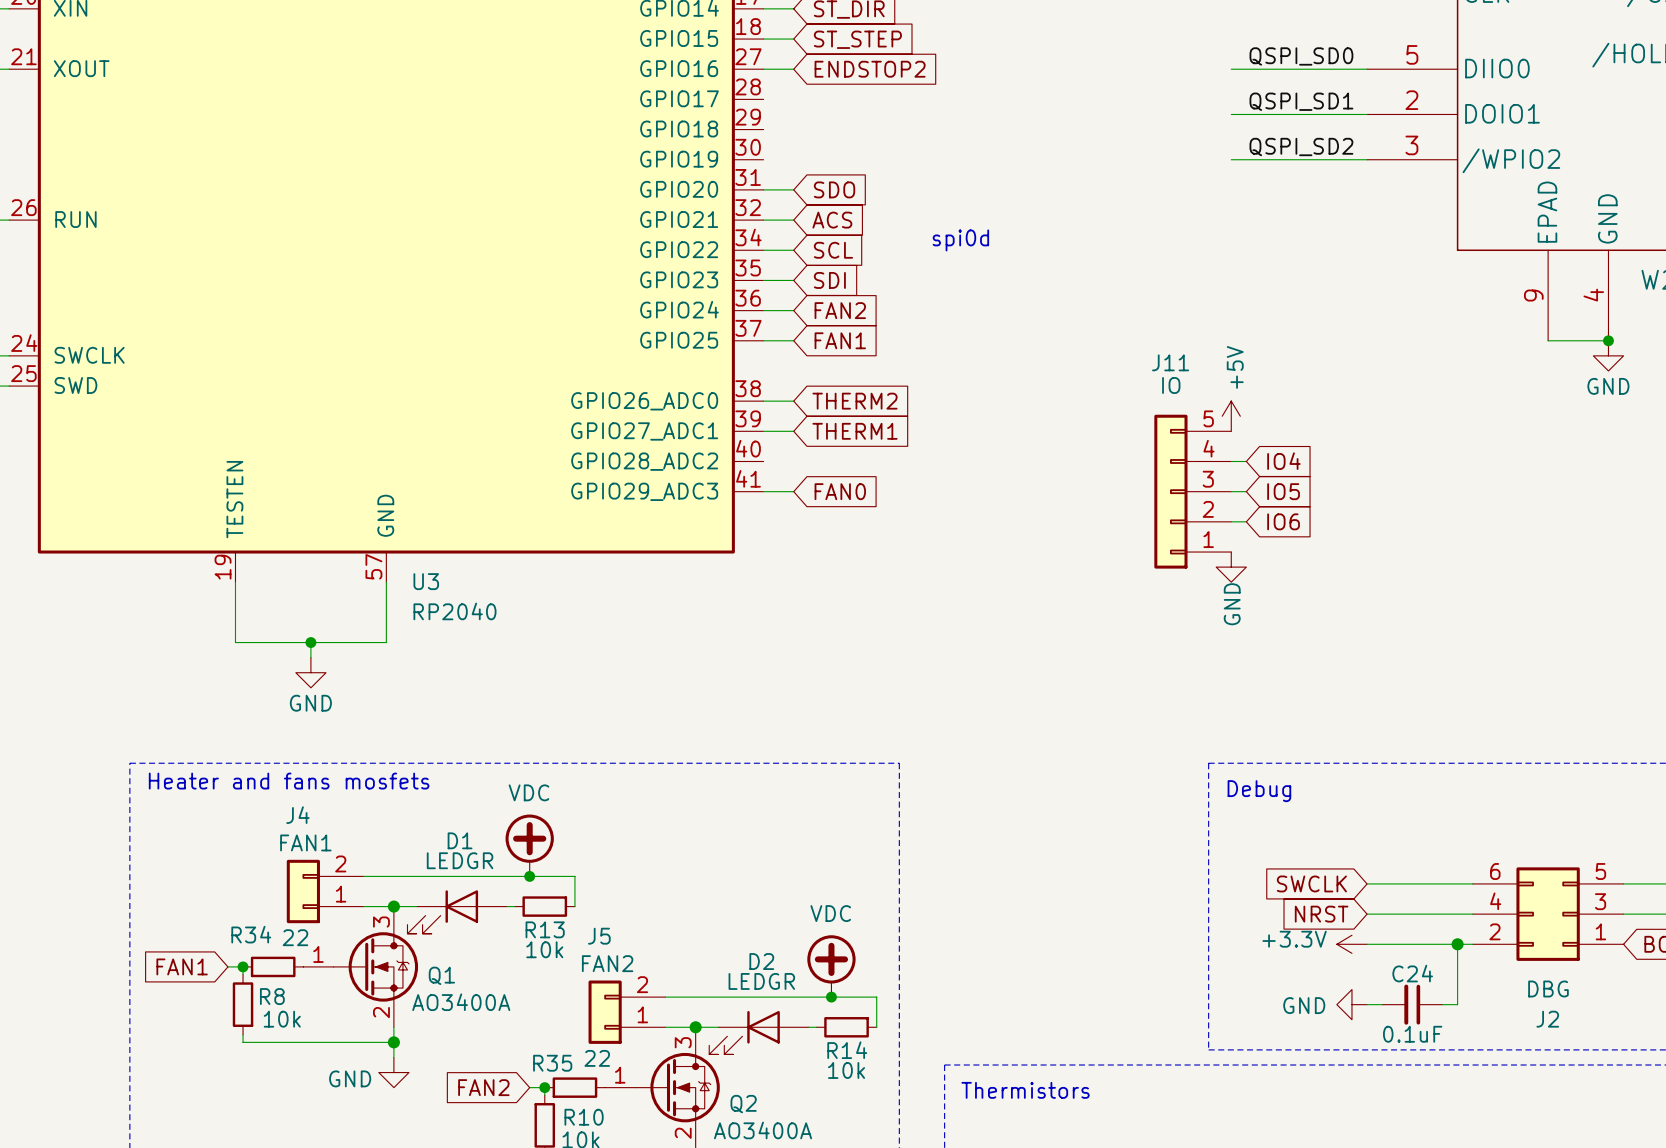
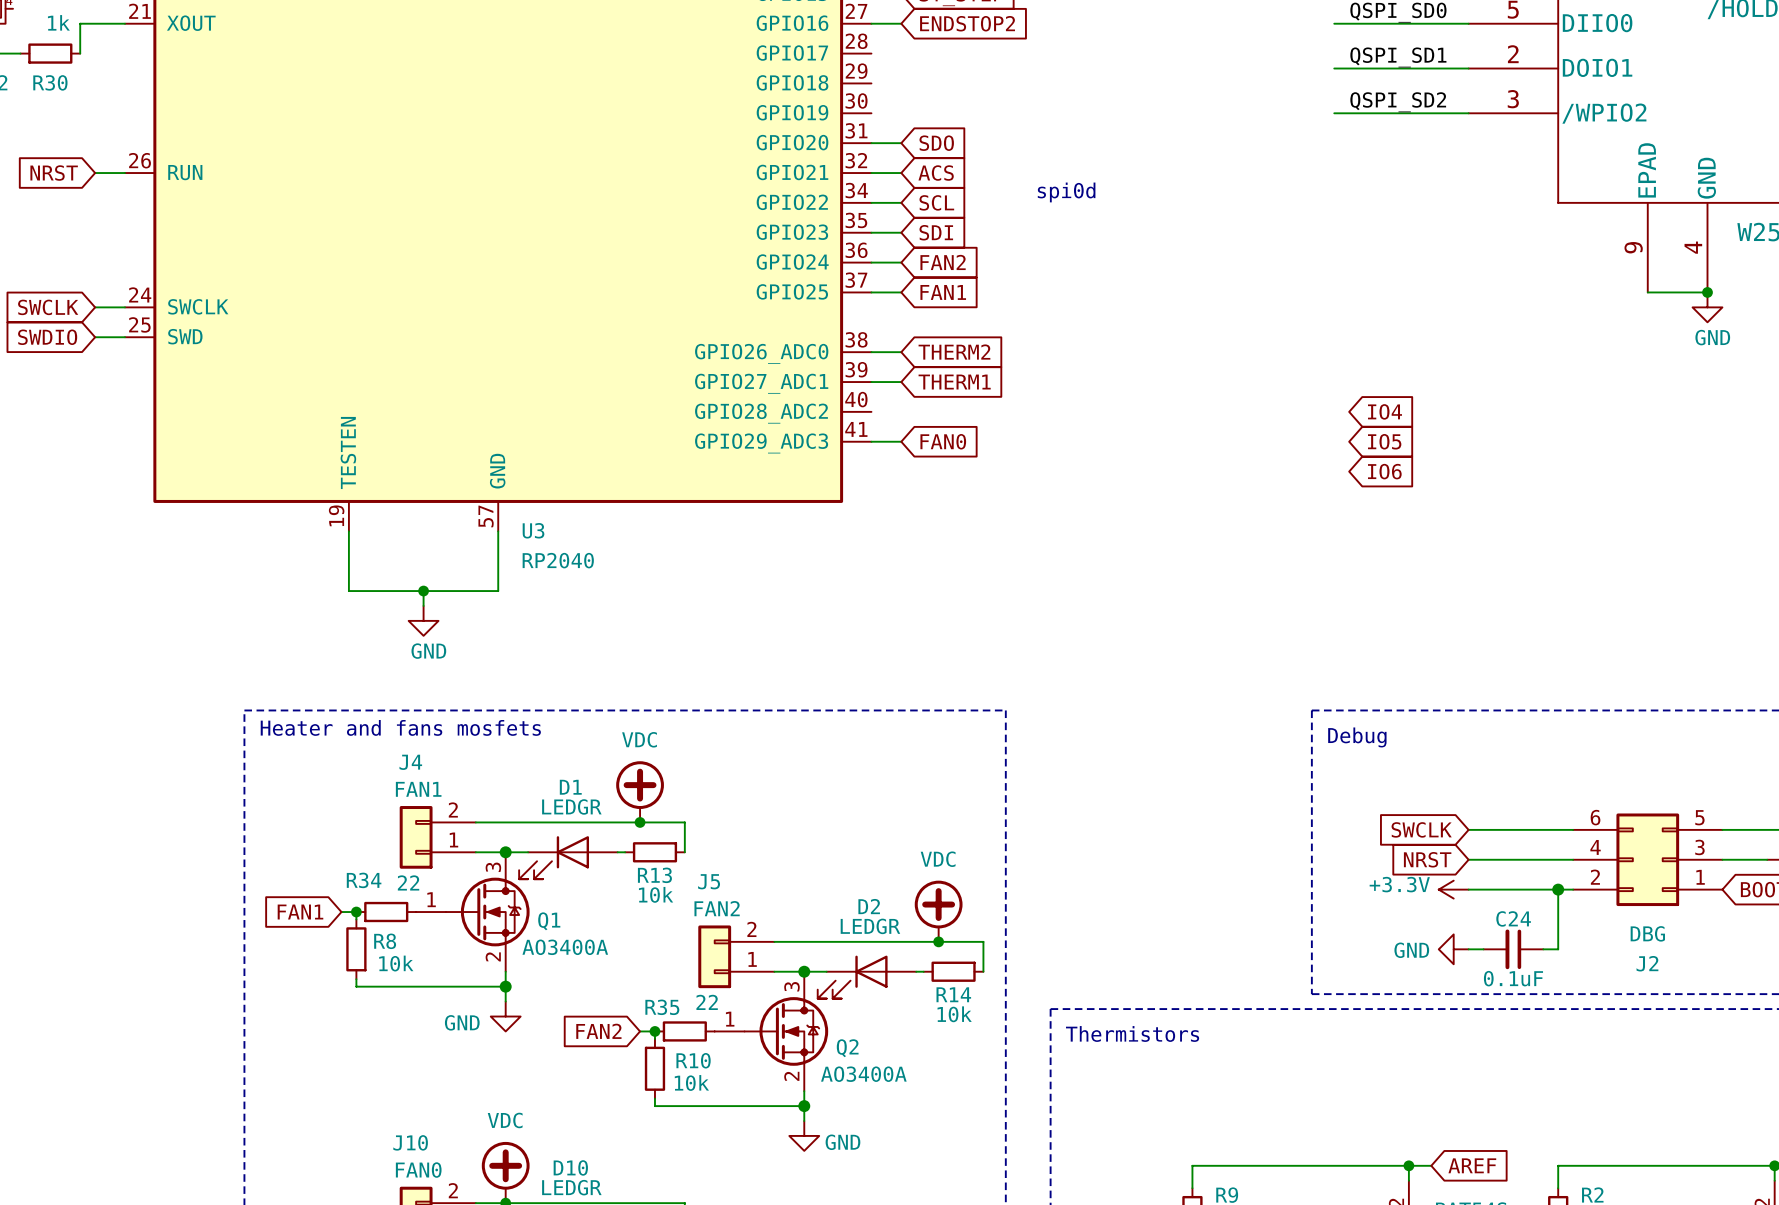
power symbol: +5V (1231, 416) -> none
wire: (1231, 461) (1246, 461) -> none
J11: IO (1192, 491) -> none
wire: (1231, 491) (1246, 491) -> none
wire: (1231, 521) (1246, 521) -> none
power symbol: GND (1231, 567) -> none

